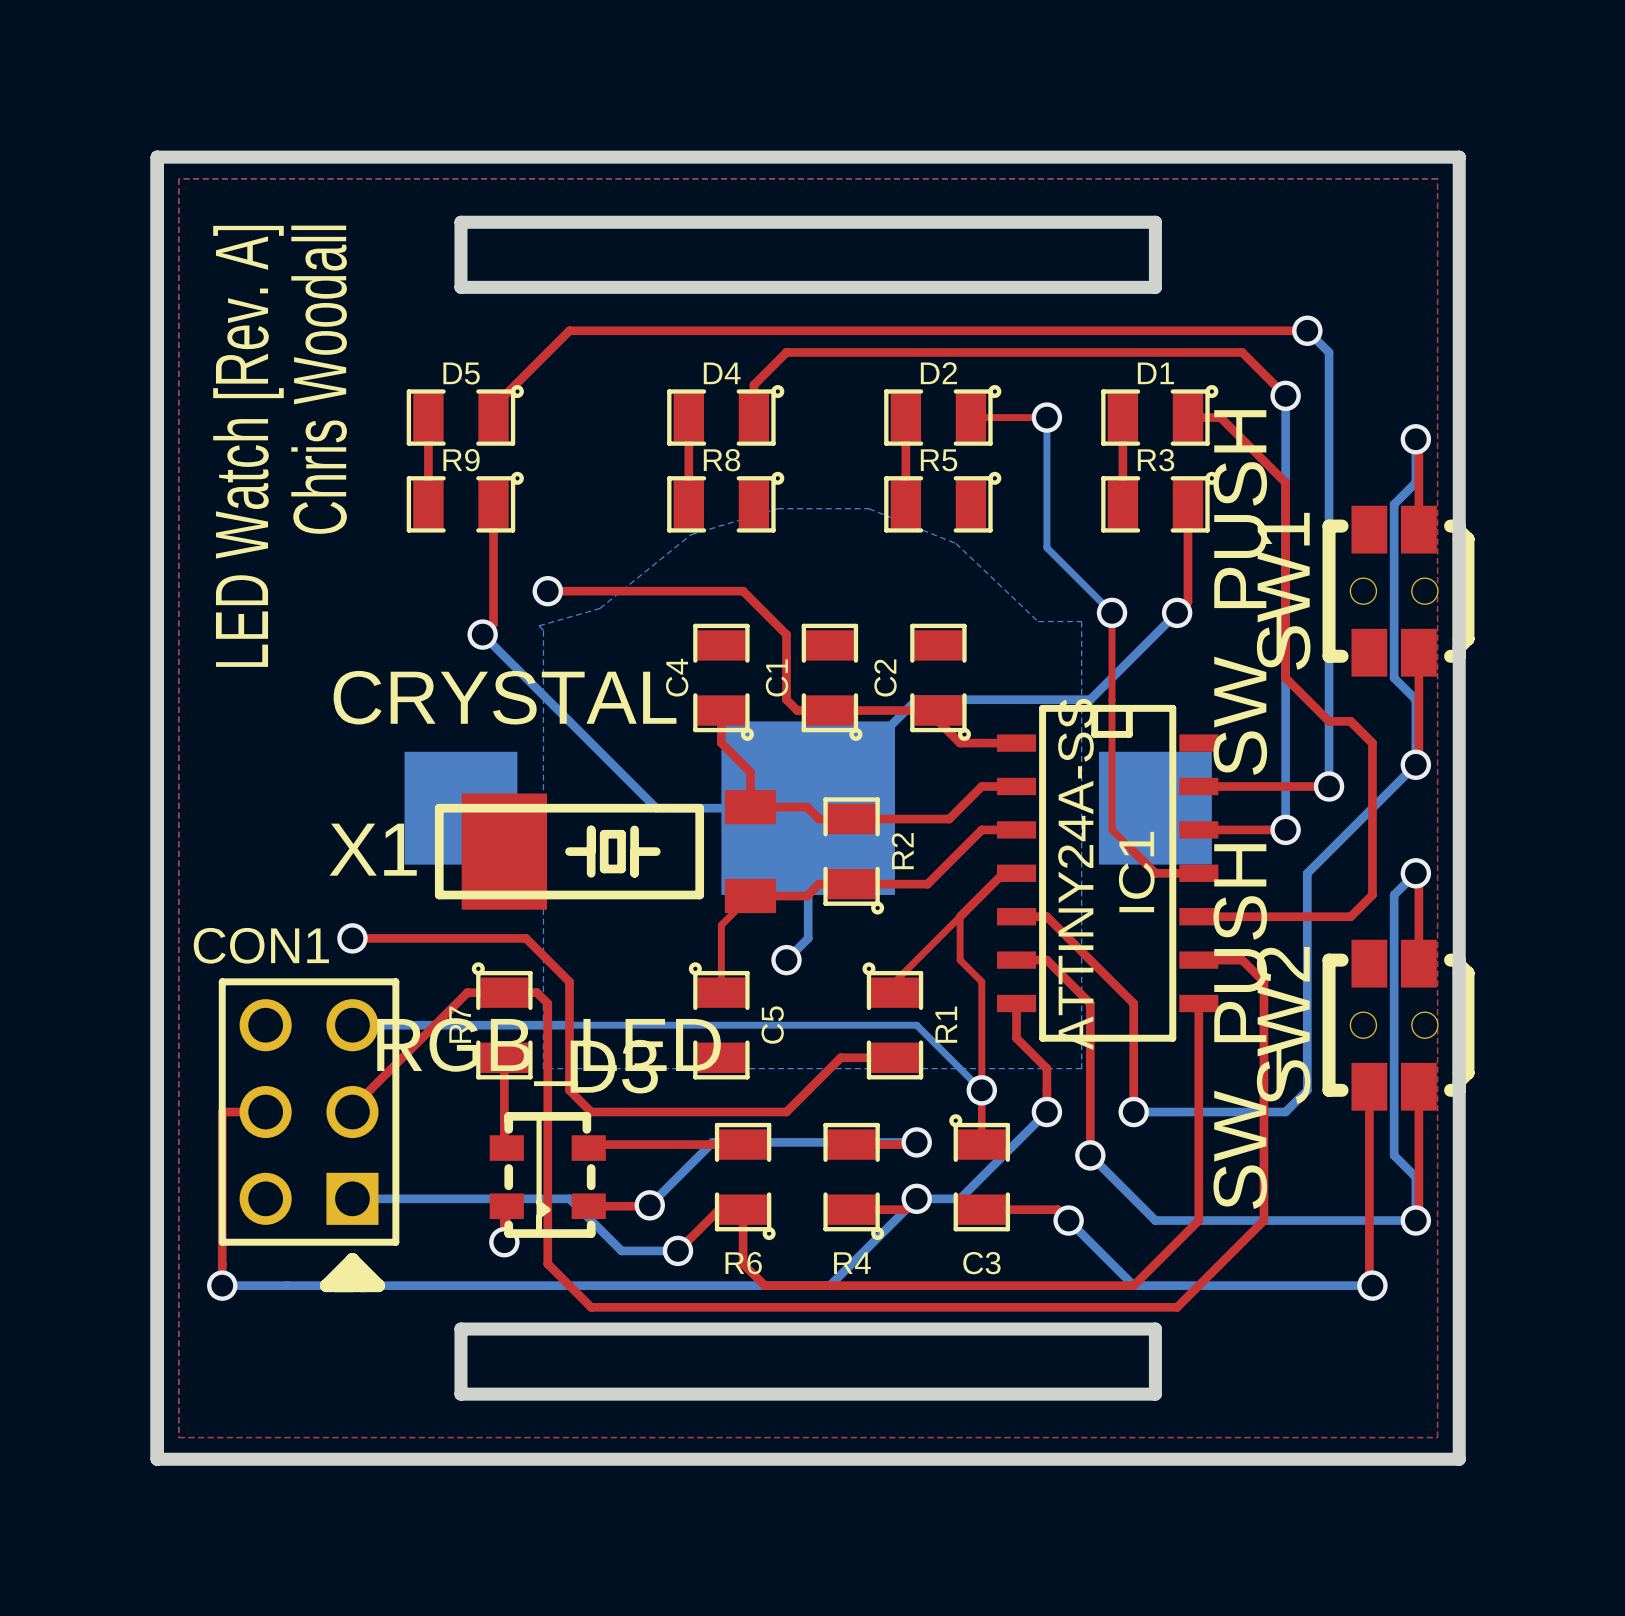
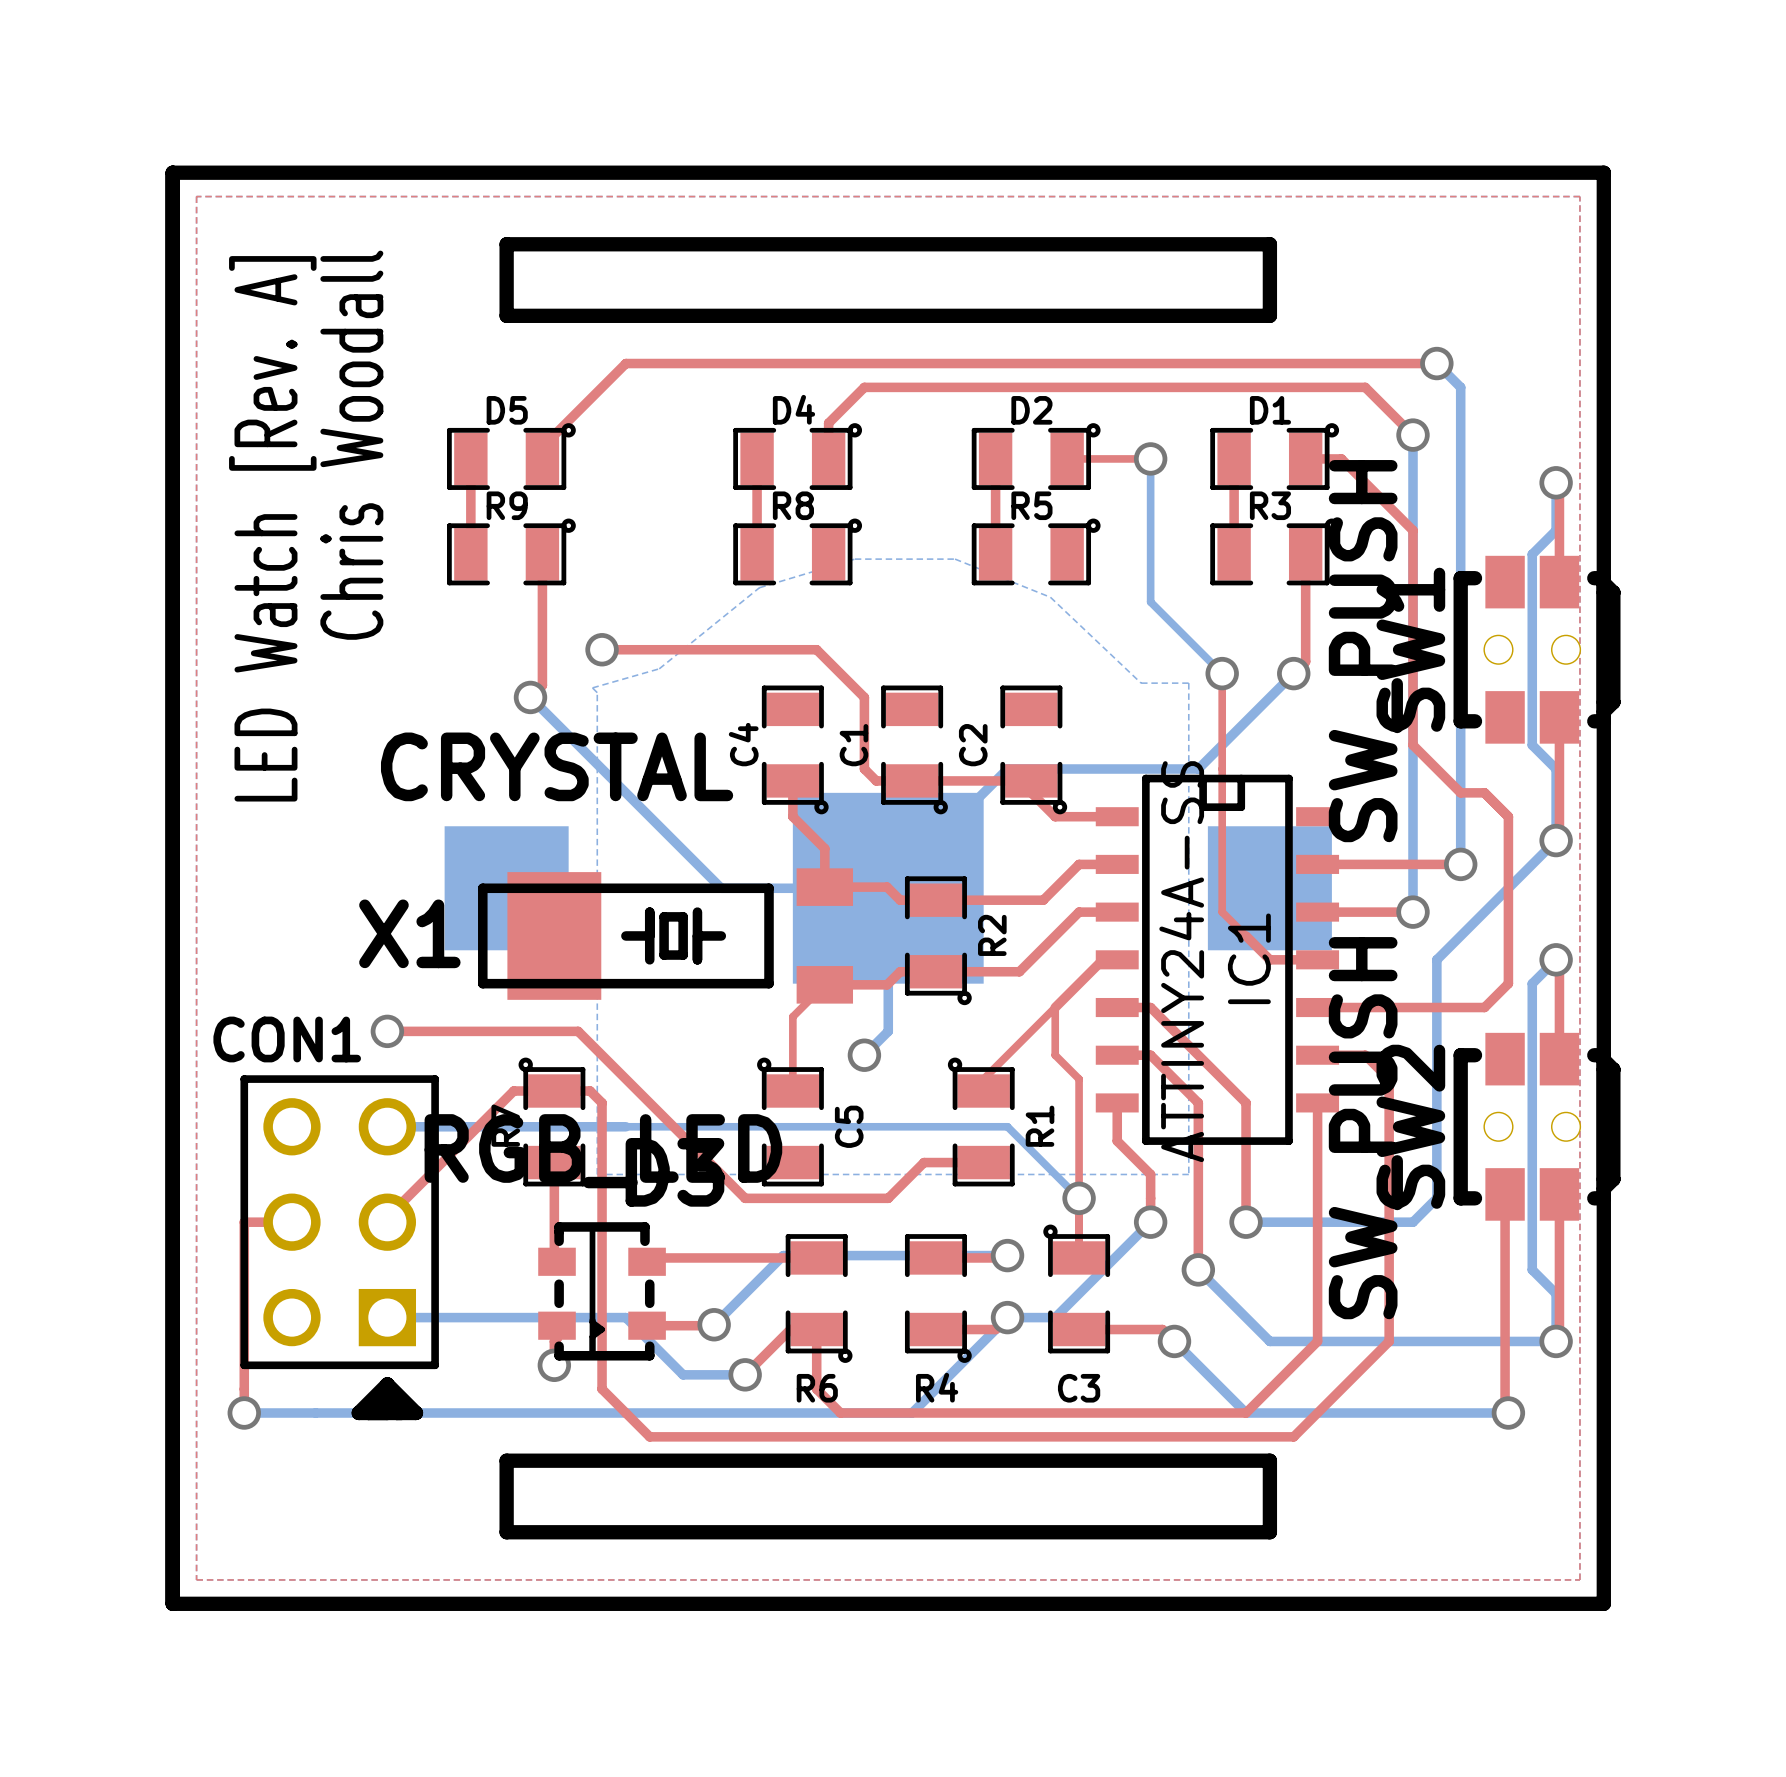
top track: (569, 981) (569, 1090) (591, 1112) (786, 1112) (808, 1090) -> (625, 1079) (745, 1198) (888, 1198)

